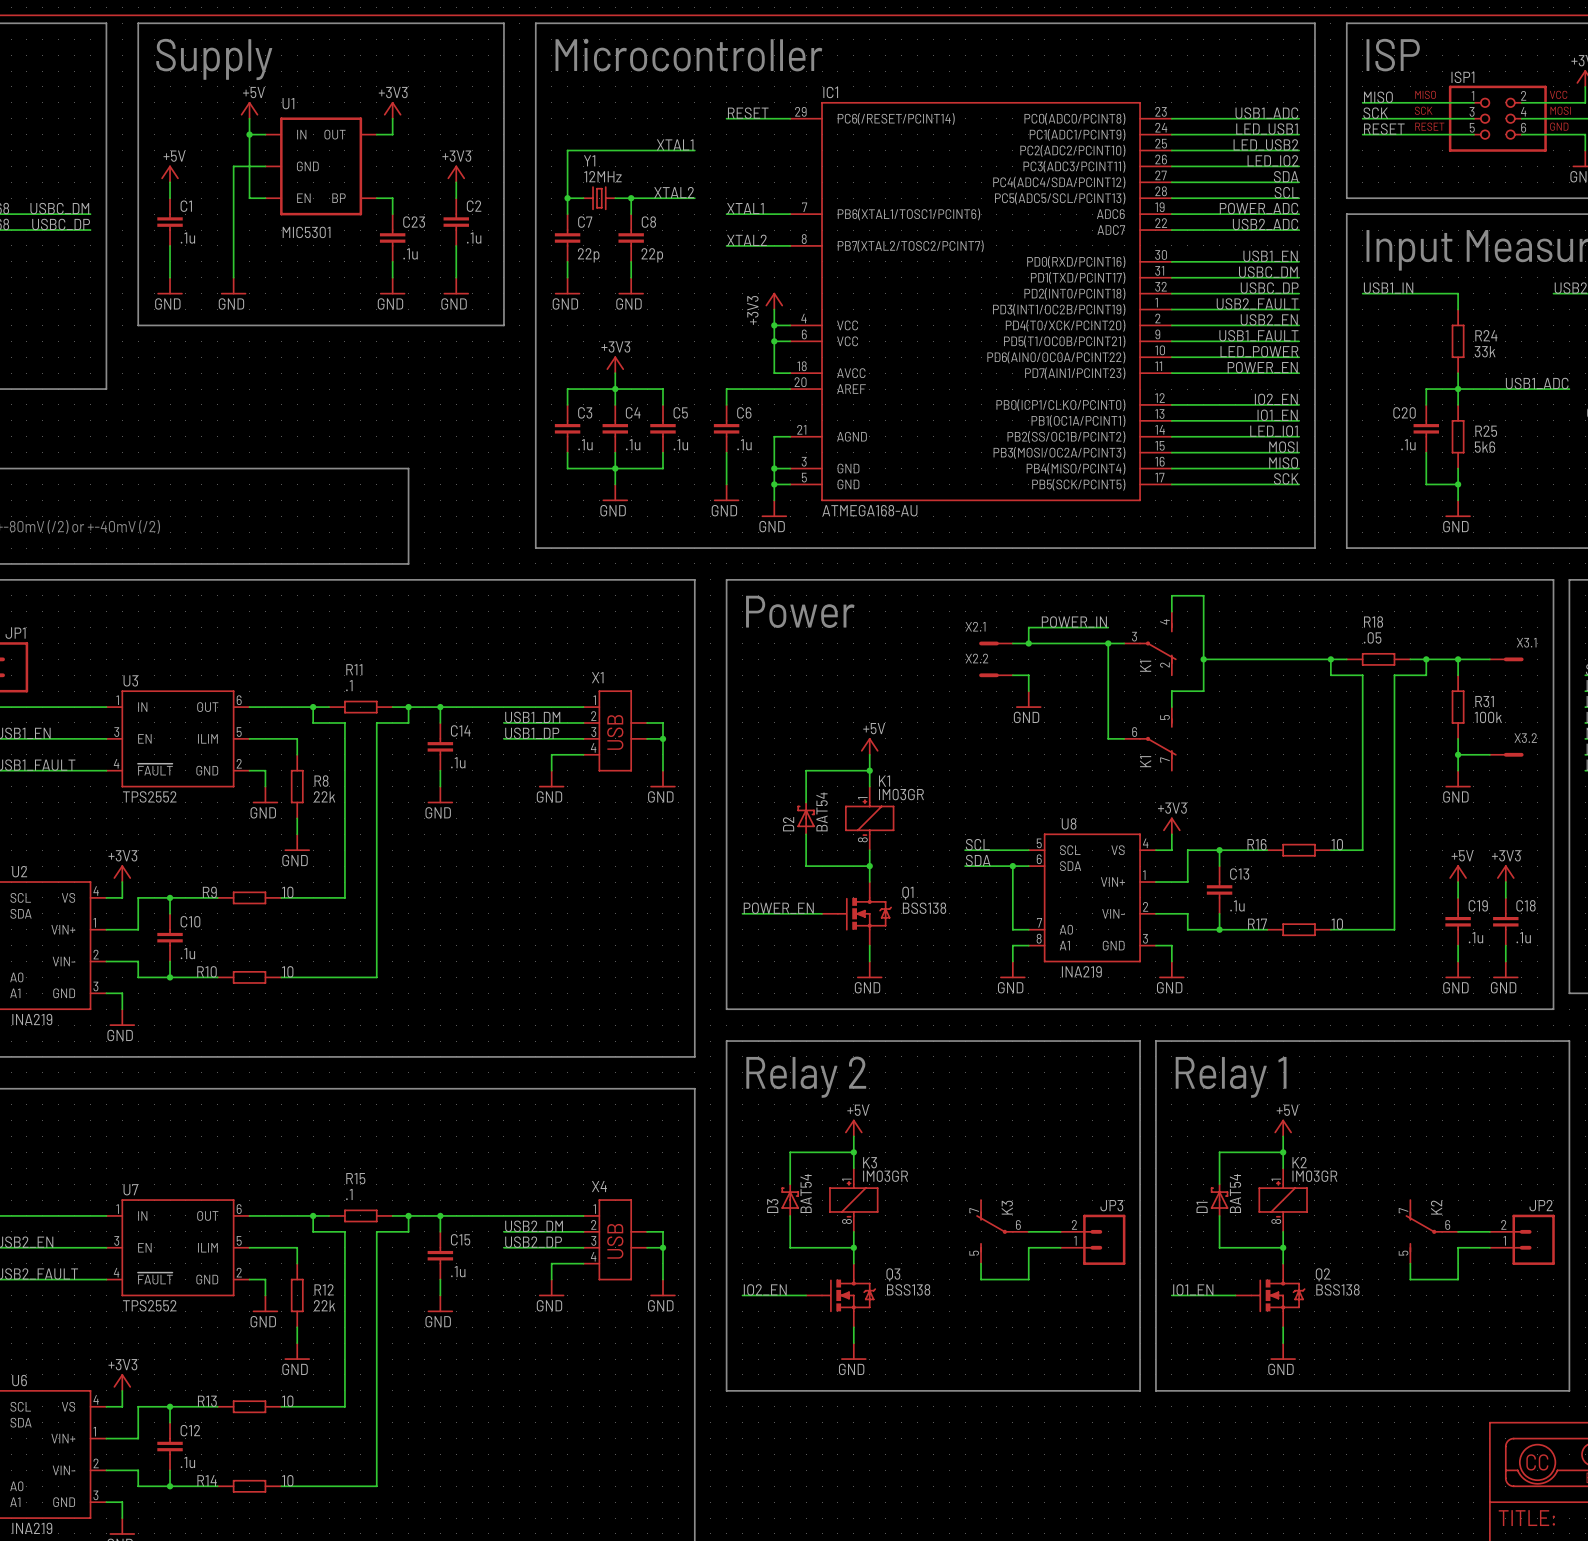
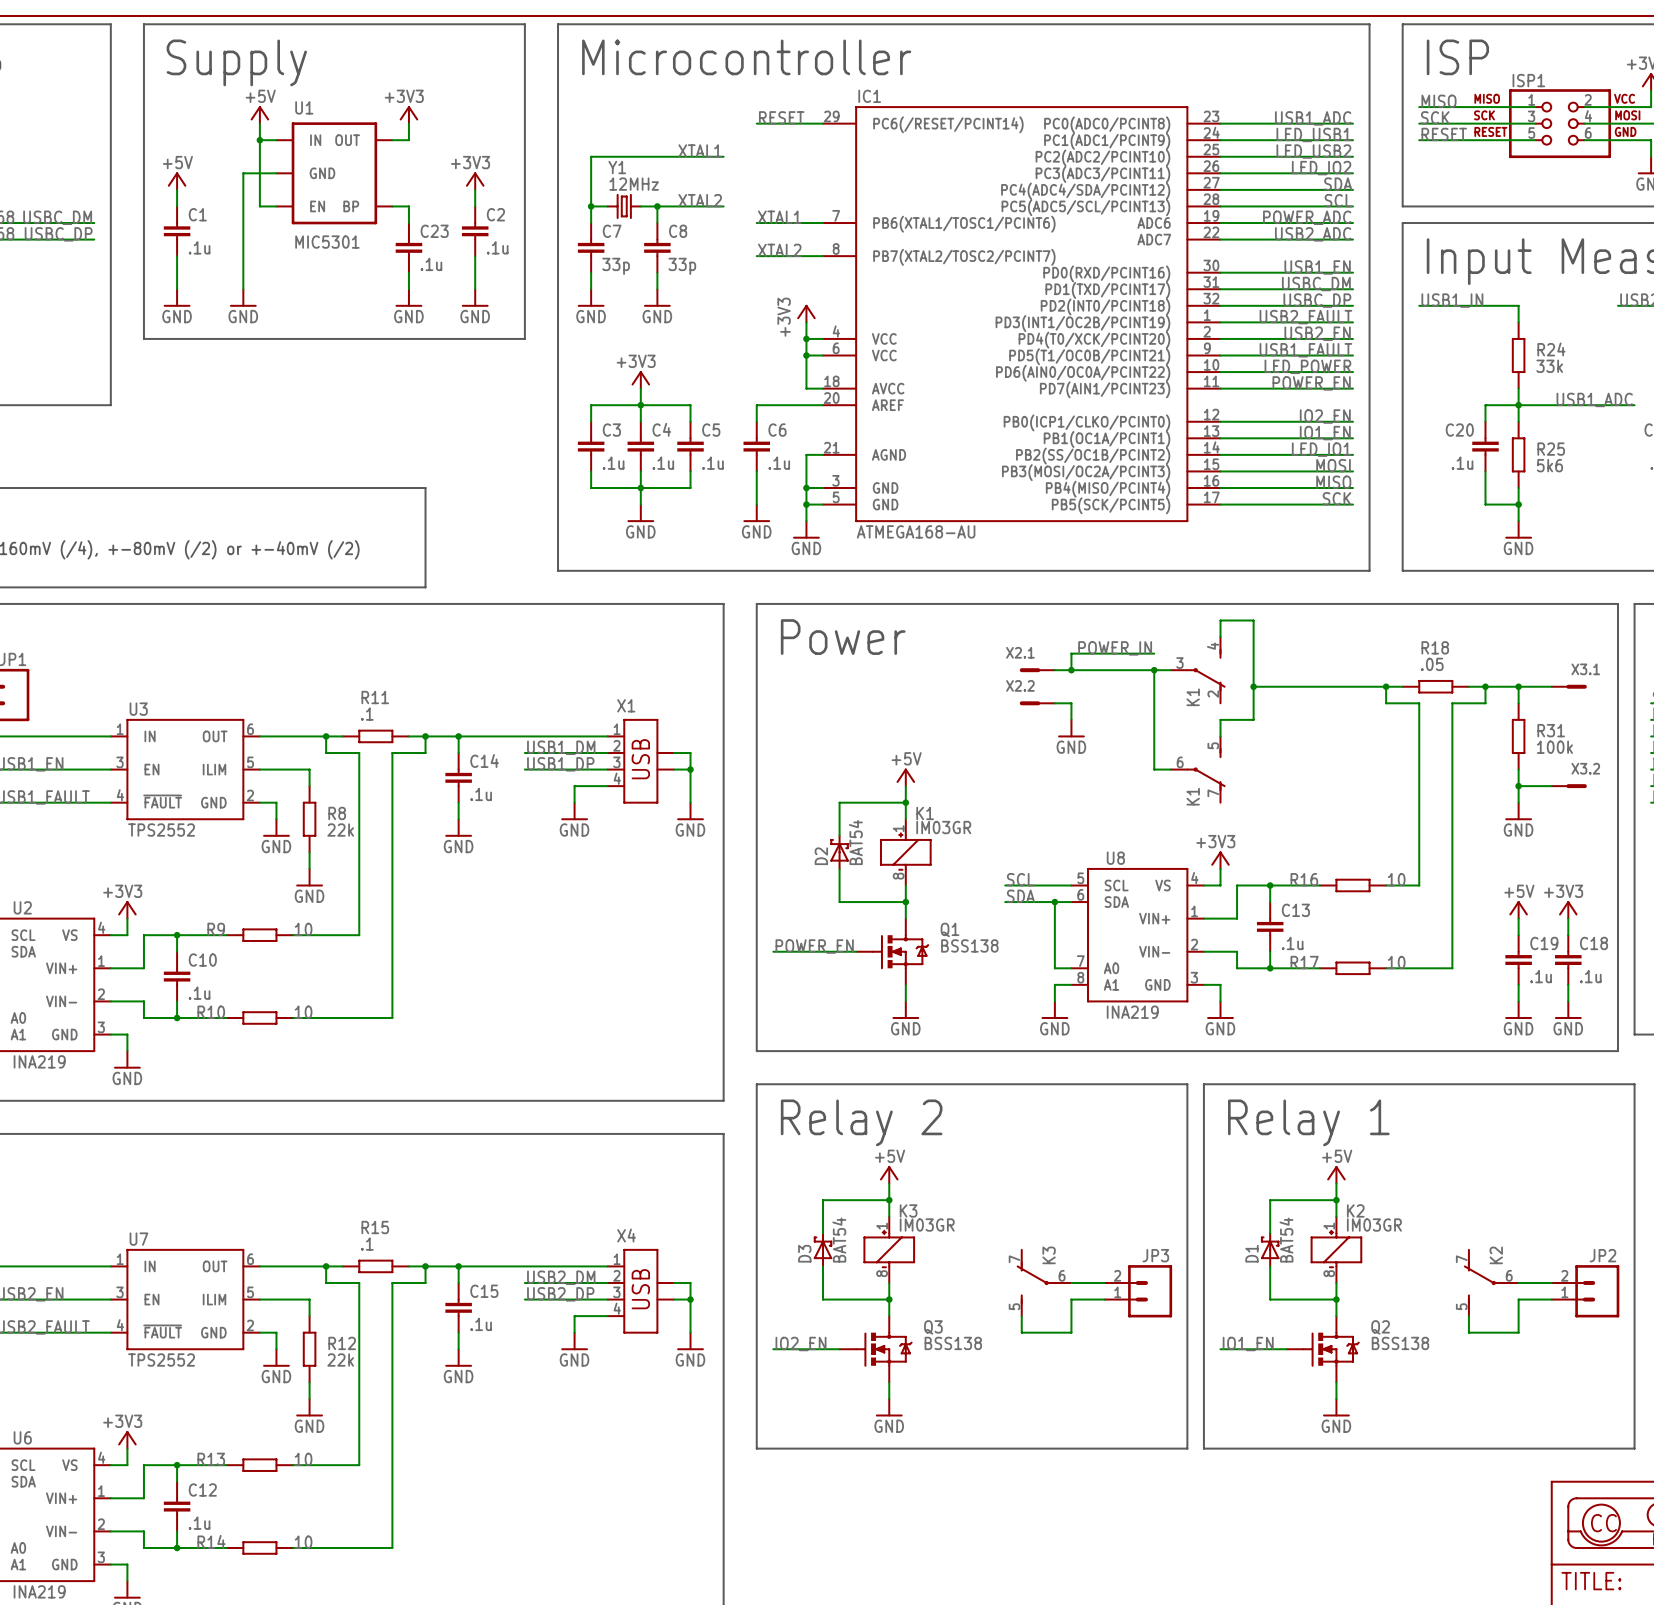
C7 value: 22p (588, 255) -> 33p (616, 266)
C8 value: 22p (652, 255) -> 33p (682, 266)

